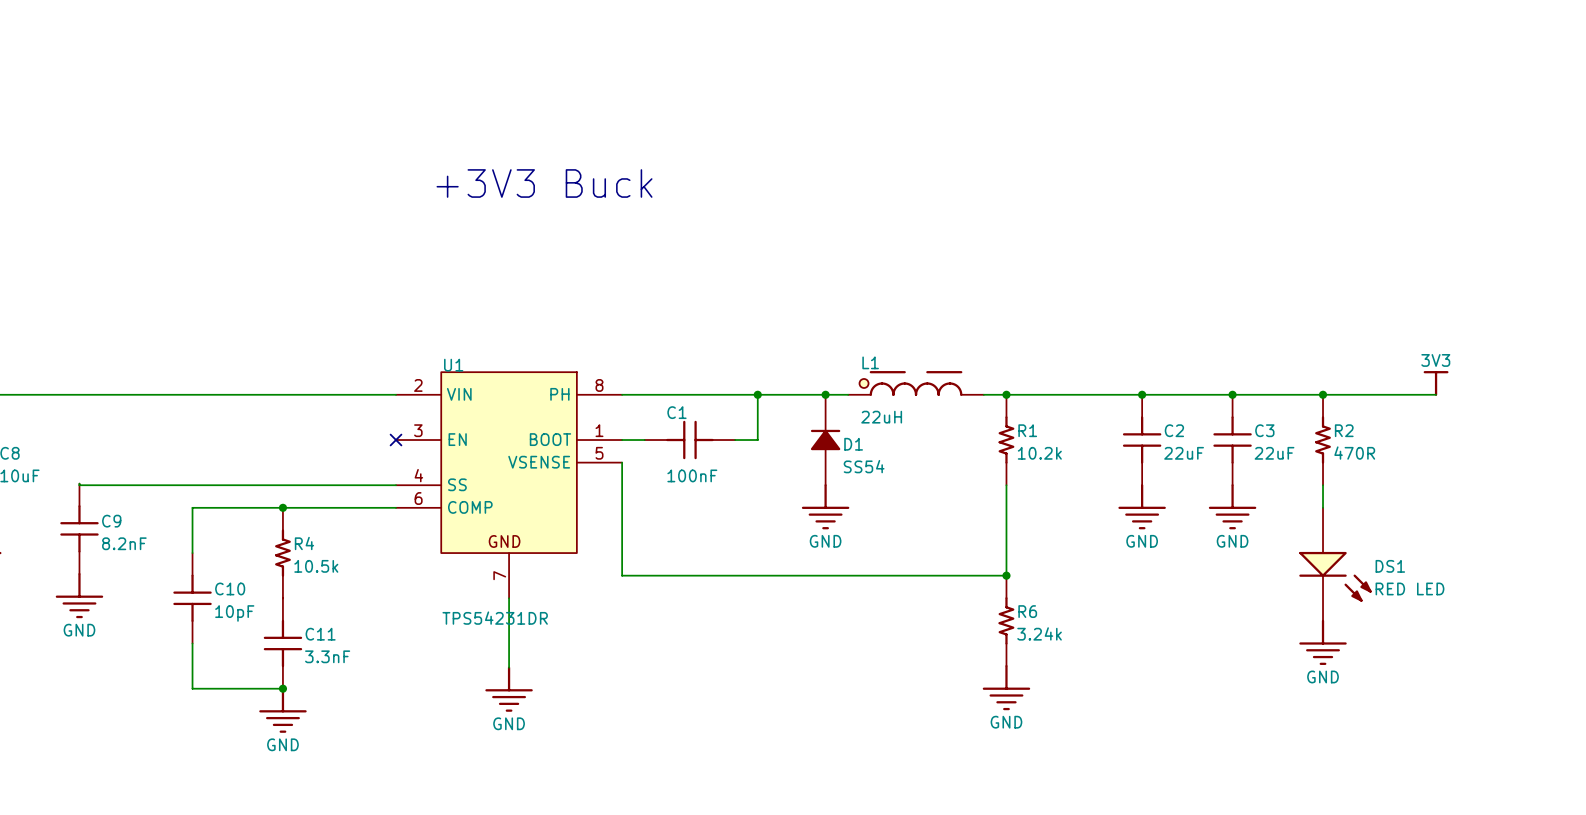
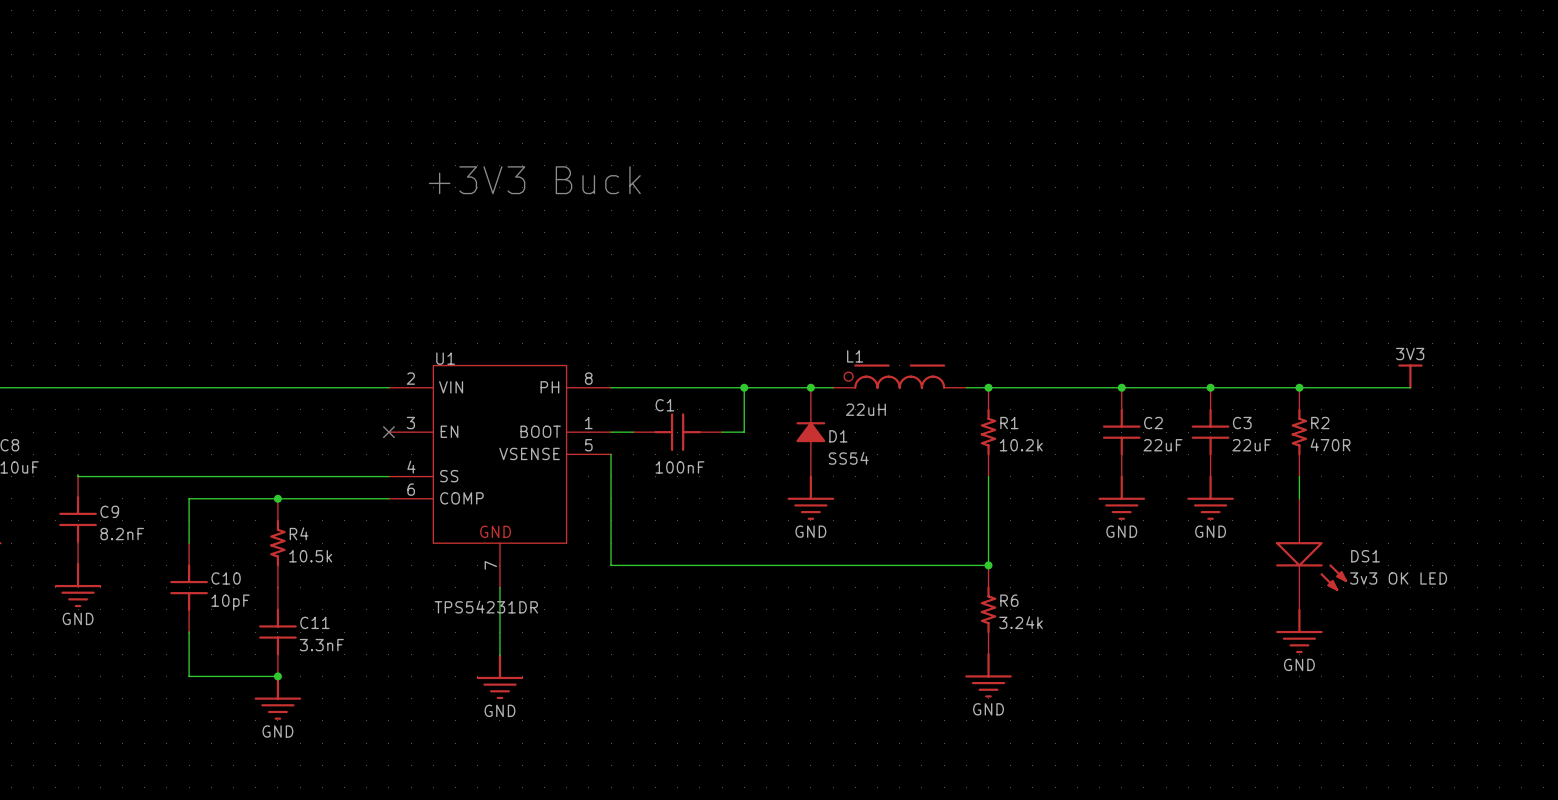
DS1 value: RED LED (1409, 588) -> 3v3 OK LED (1398, 578)

